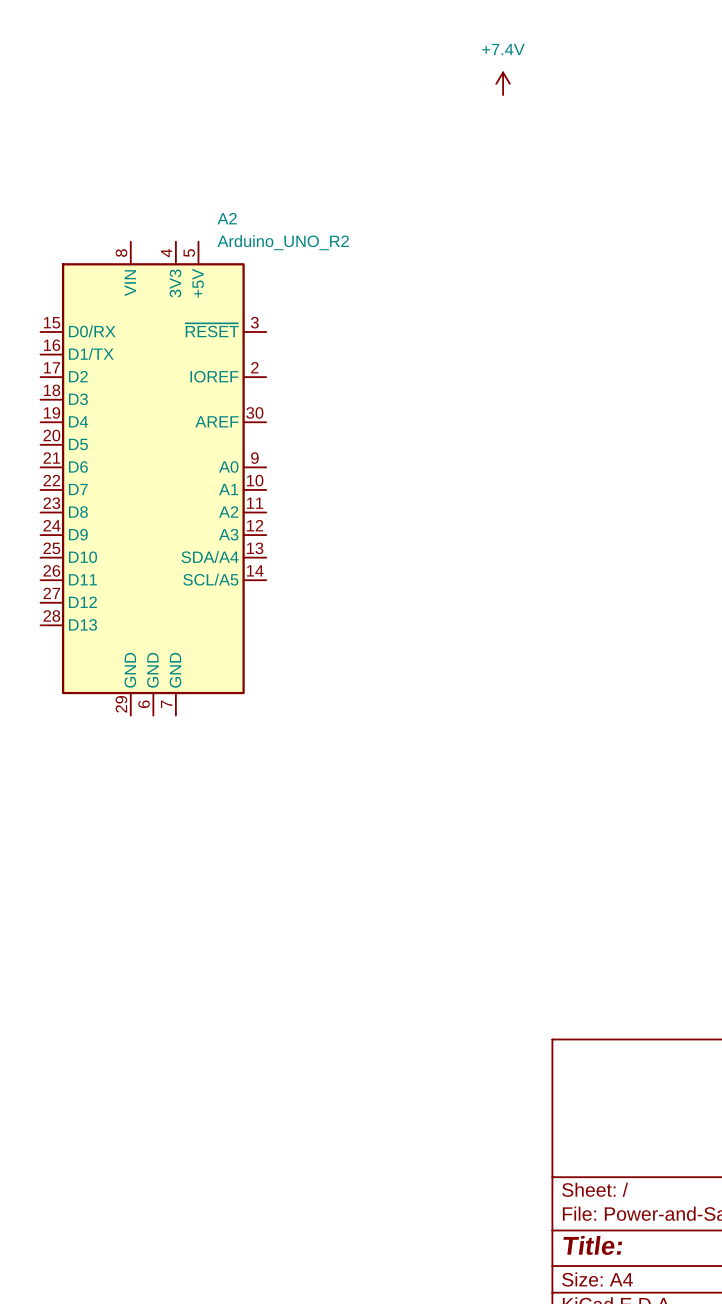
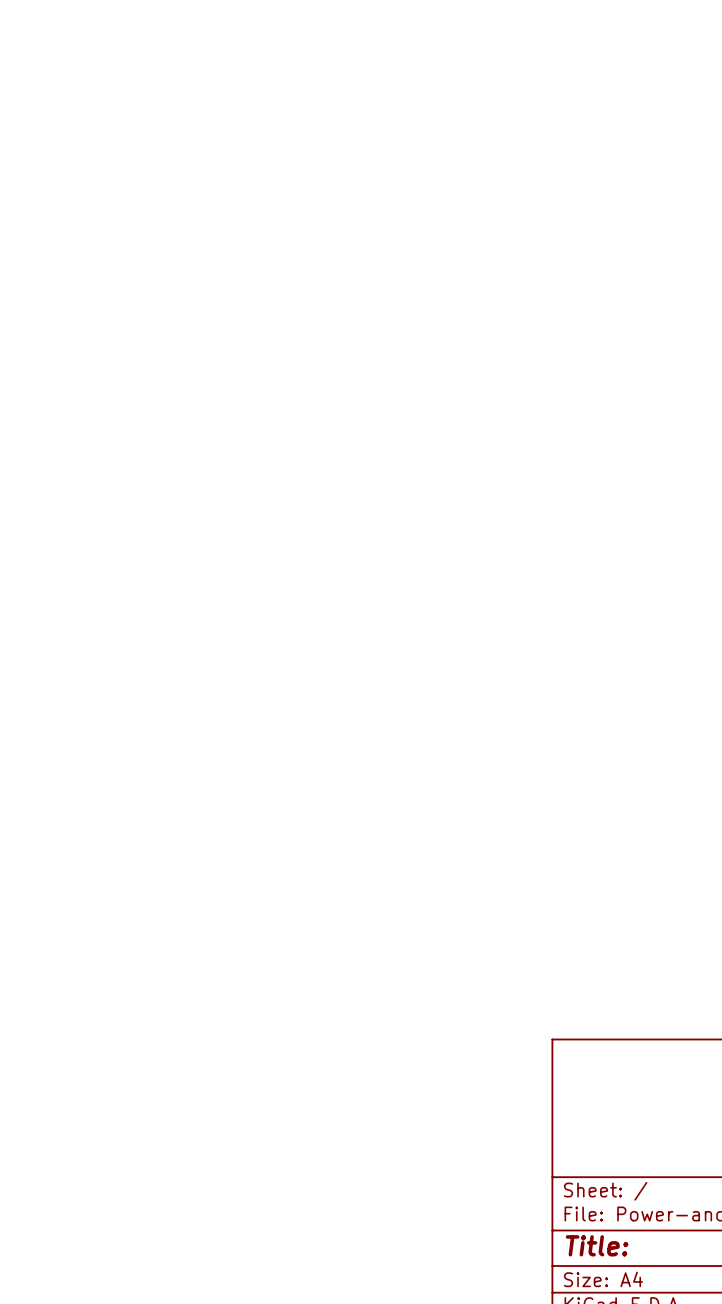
power symbol: +7.4V (503, 83) -> none
A2: Arduino_UNO_R2 (153, 478) -> none

